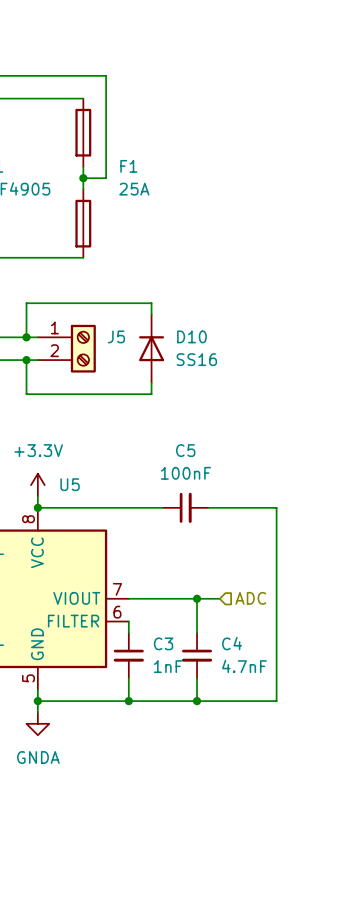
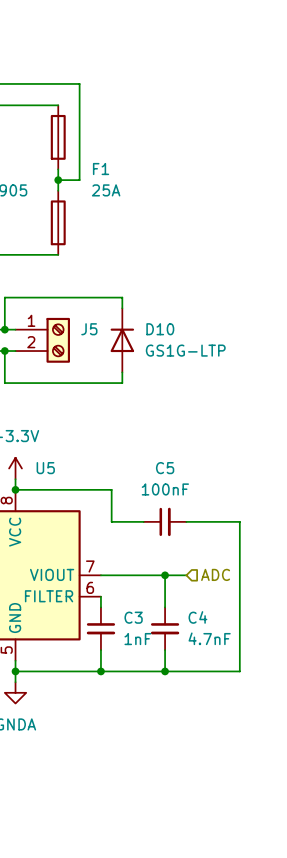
D10 value: SS16 (196, 359) -> GS1G-LTP (185, 350)
wire: (140, 507) (162, 507) -> (111, 489) (111, 521) (143, 521)
C5 position: (185, 507) -> (165, 521)
wire: (208, 507) (276, 507) (276, 541) -> (186, 521) (239, 521)

